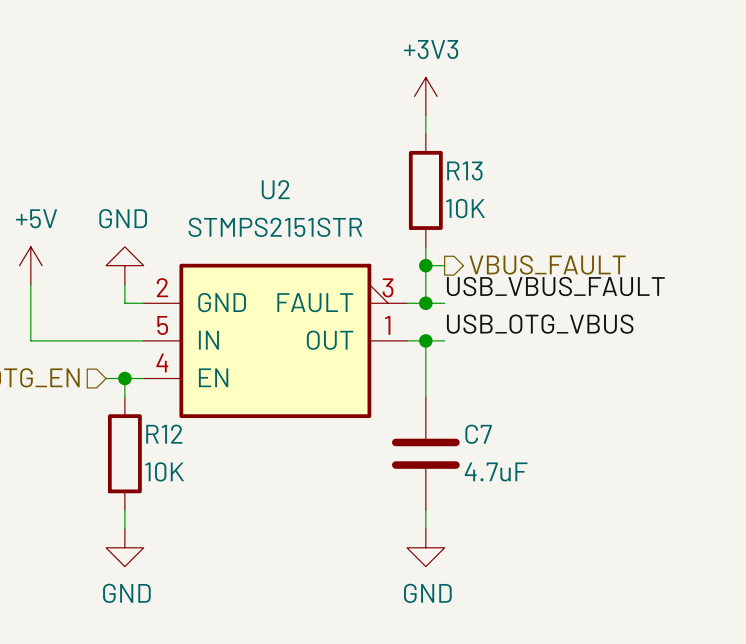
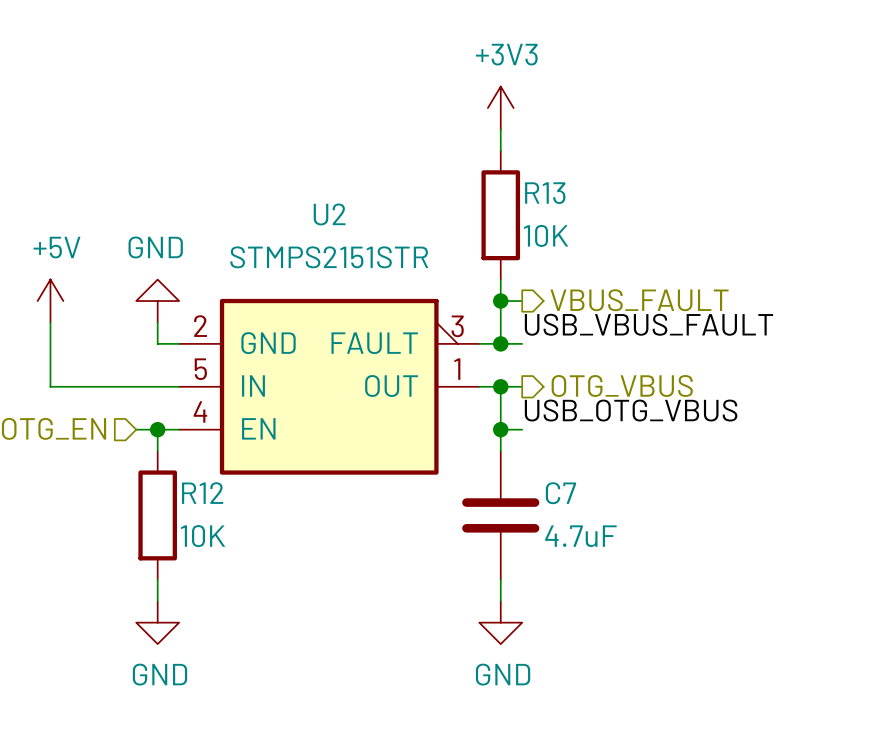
label position: USB_OTG_VBUS (540, 324) -> USB_OTG_VBUS (631, 410)
hierarchical label: none -> OTG_VBUS (622, 385)
wire: none -> (500, 429) (522, 429)
junction: none -> (500, 429)

